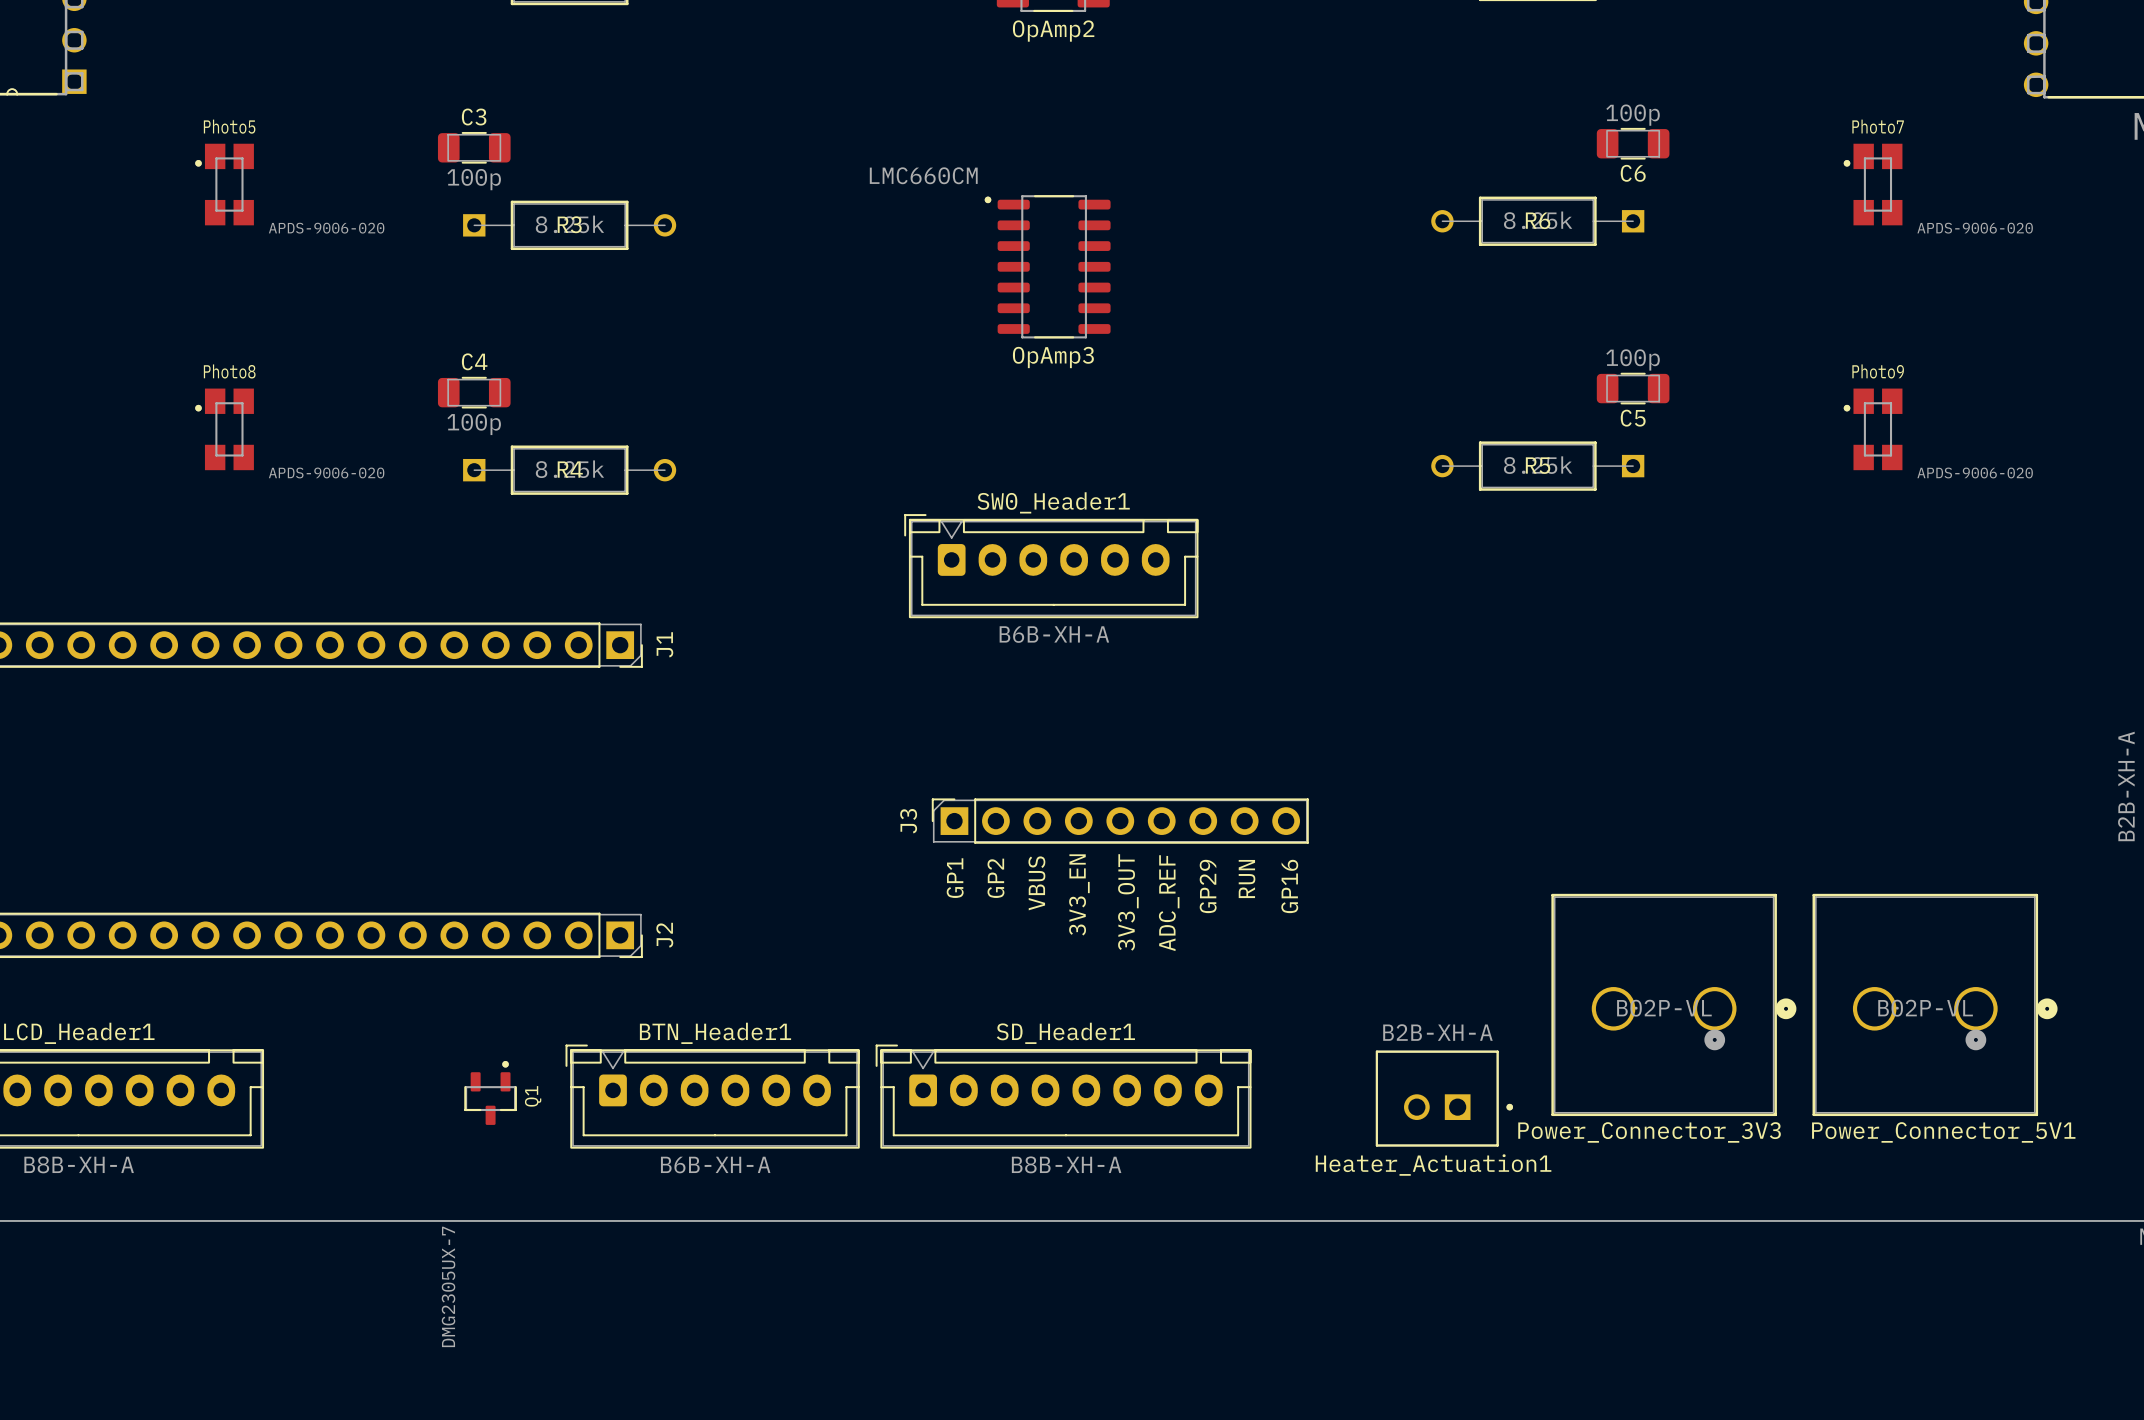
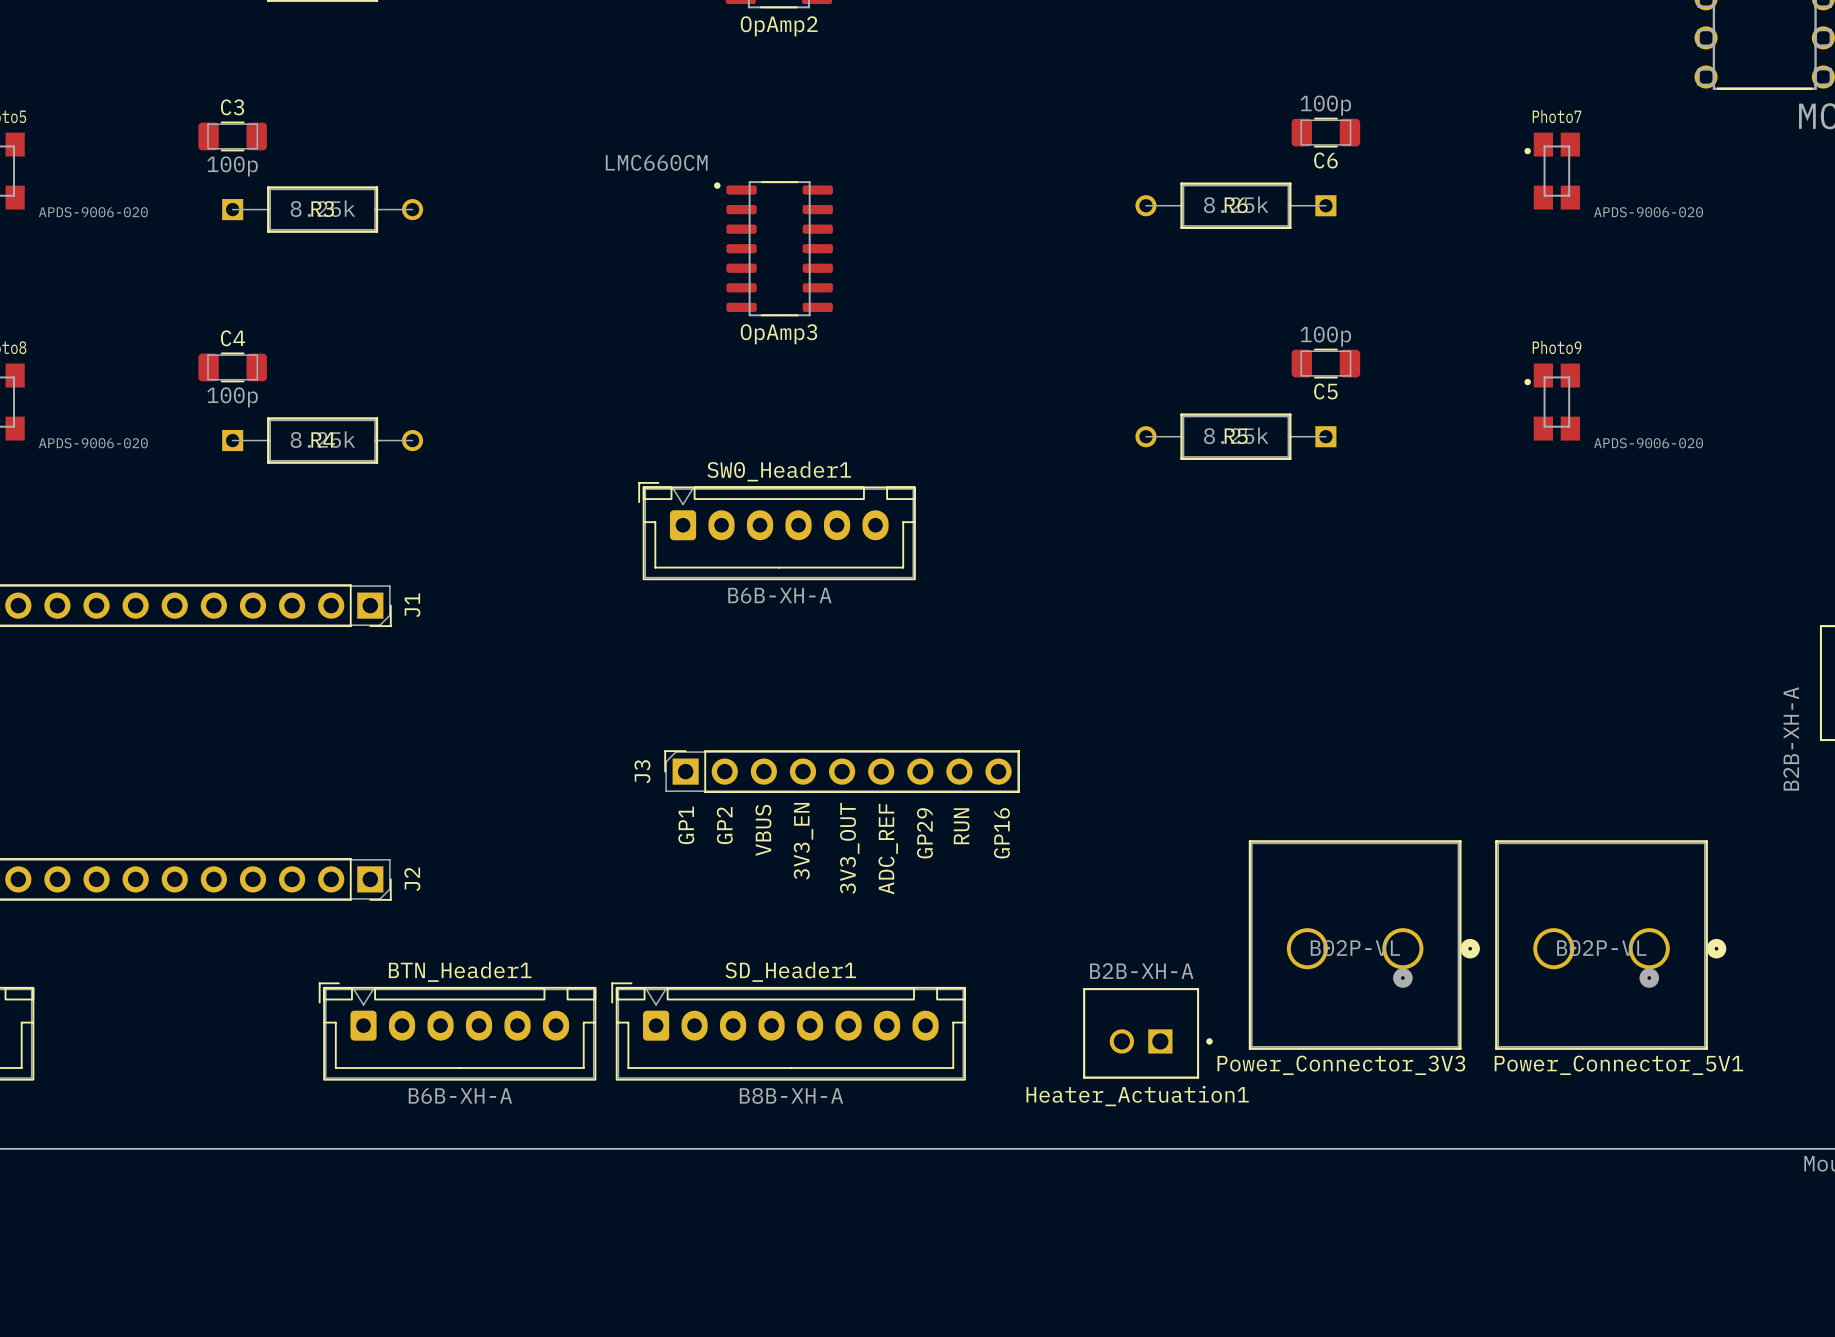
Q1: DMG2305UX-7 (490, 1092) -> none

